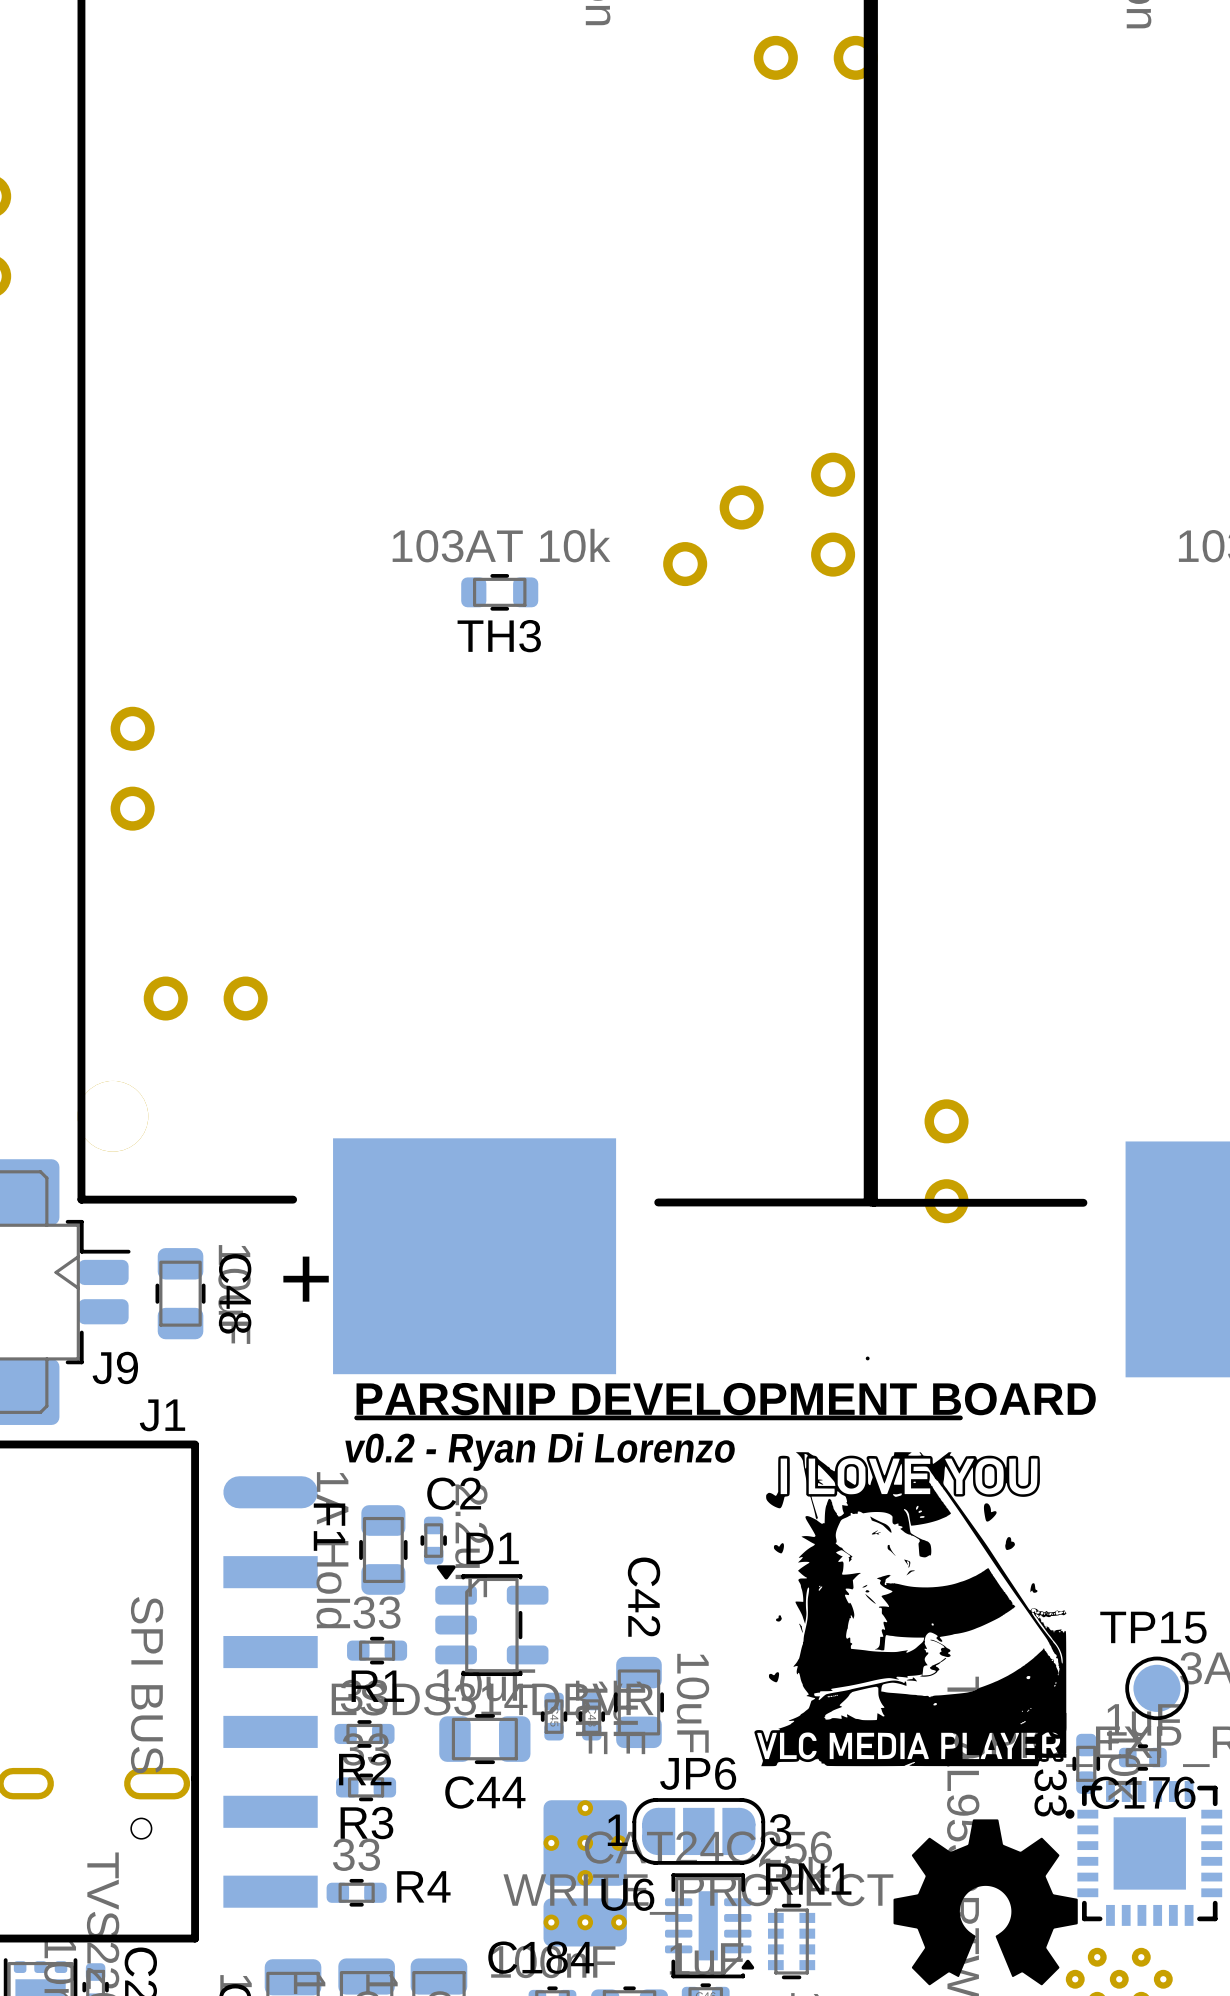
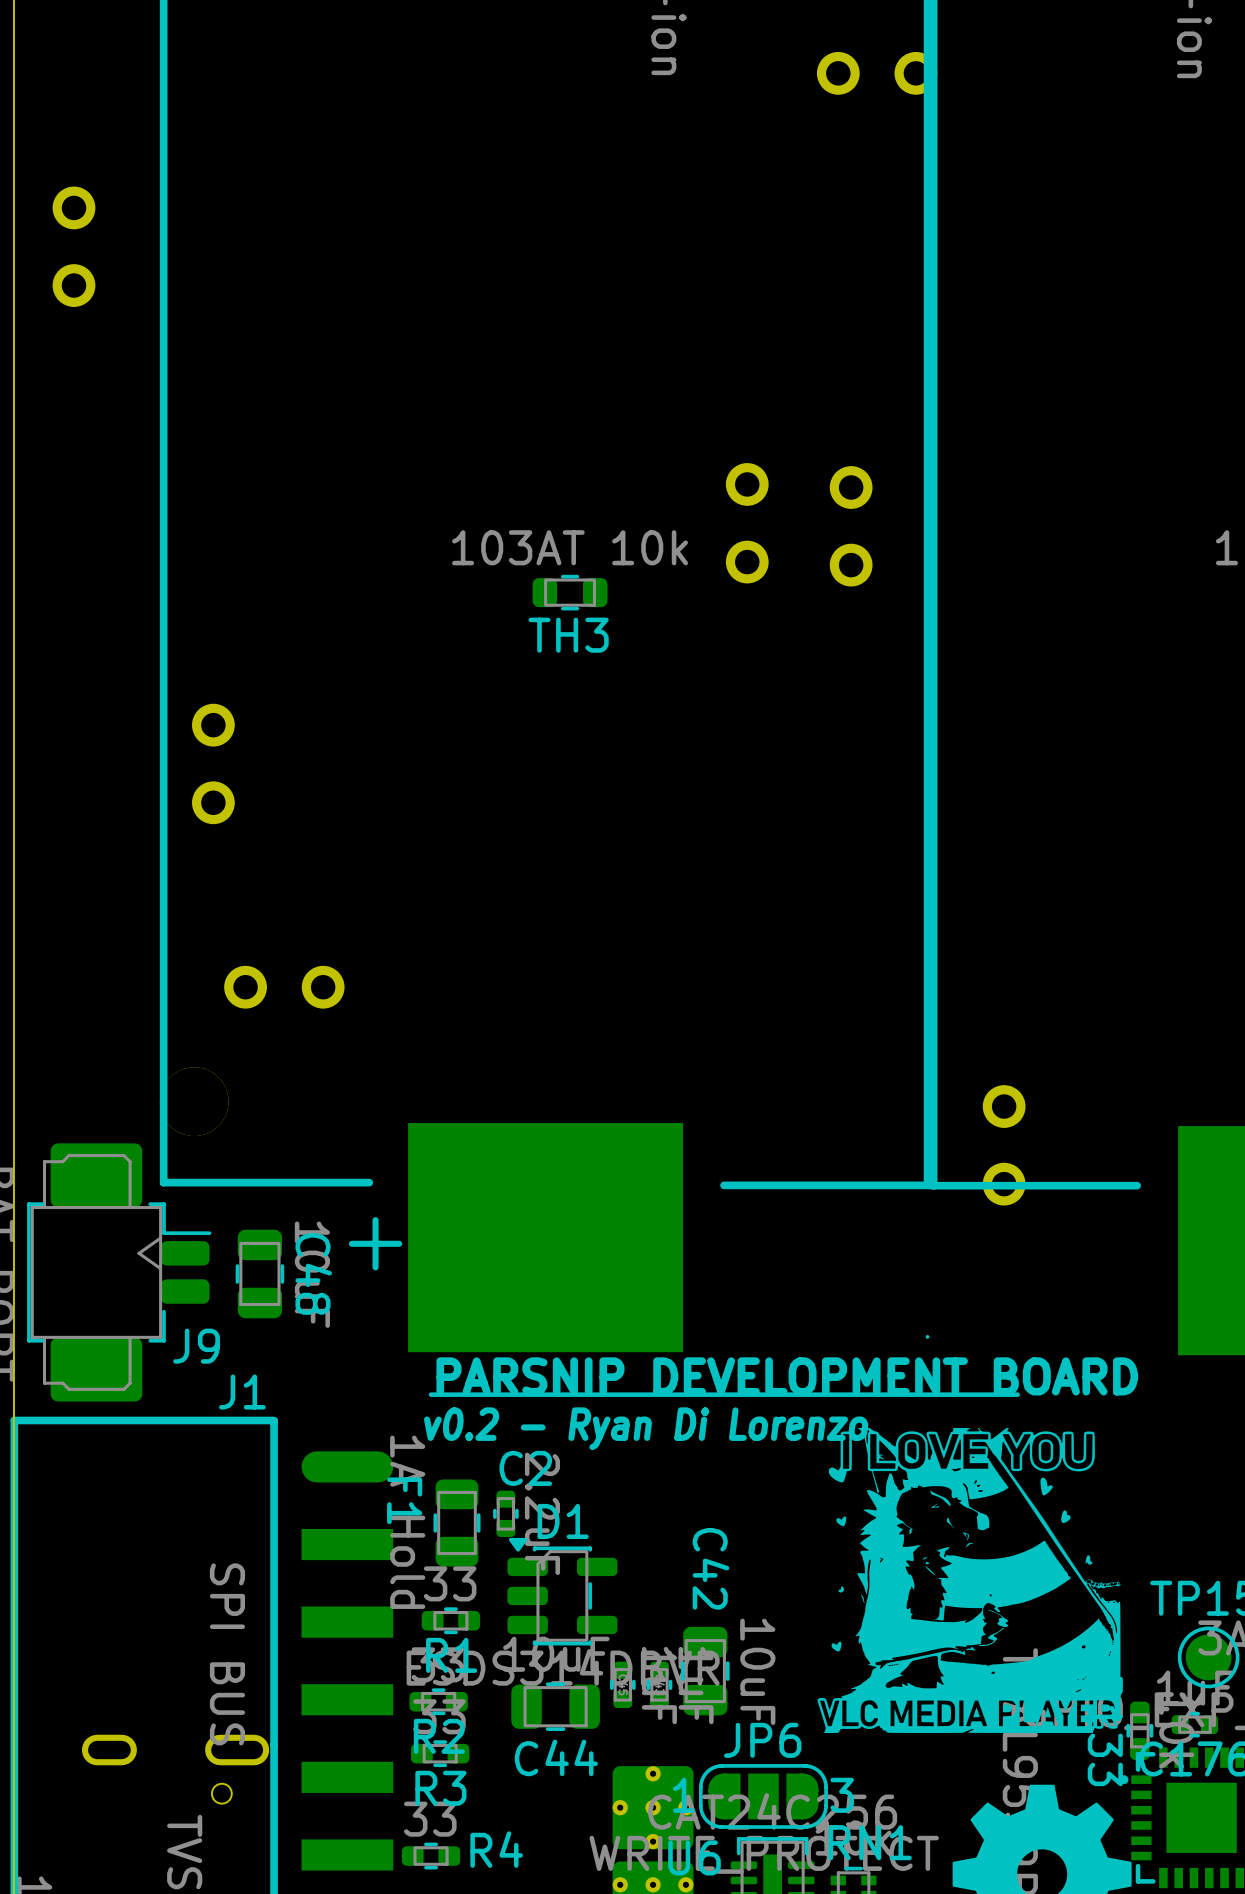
part position: (833, 514) -> (851, 526)
part: none -> (747, 523)
part: (713, 535) -> none

